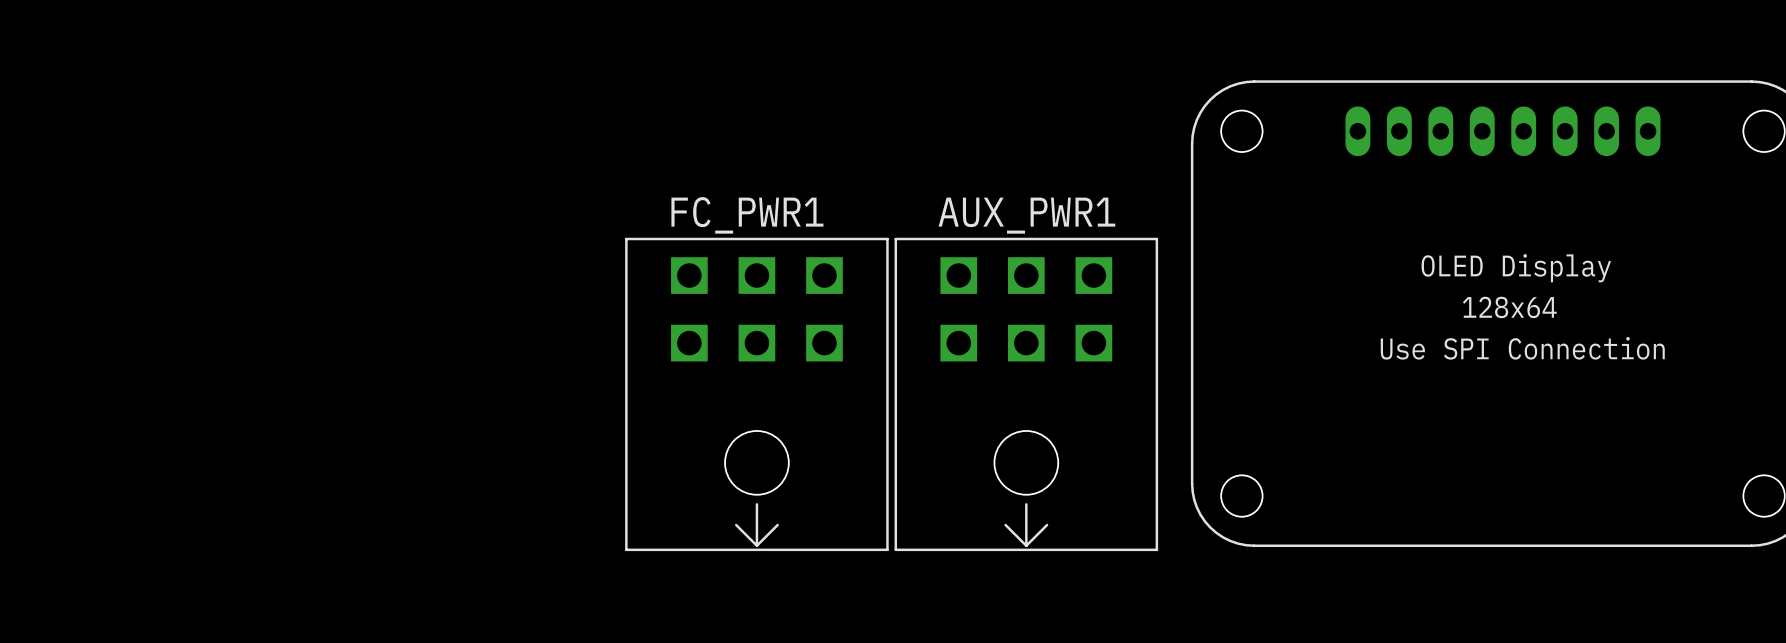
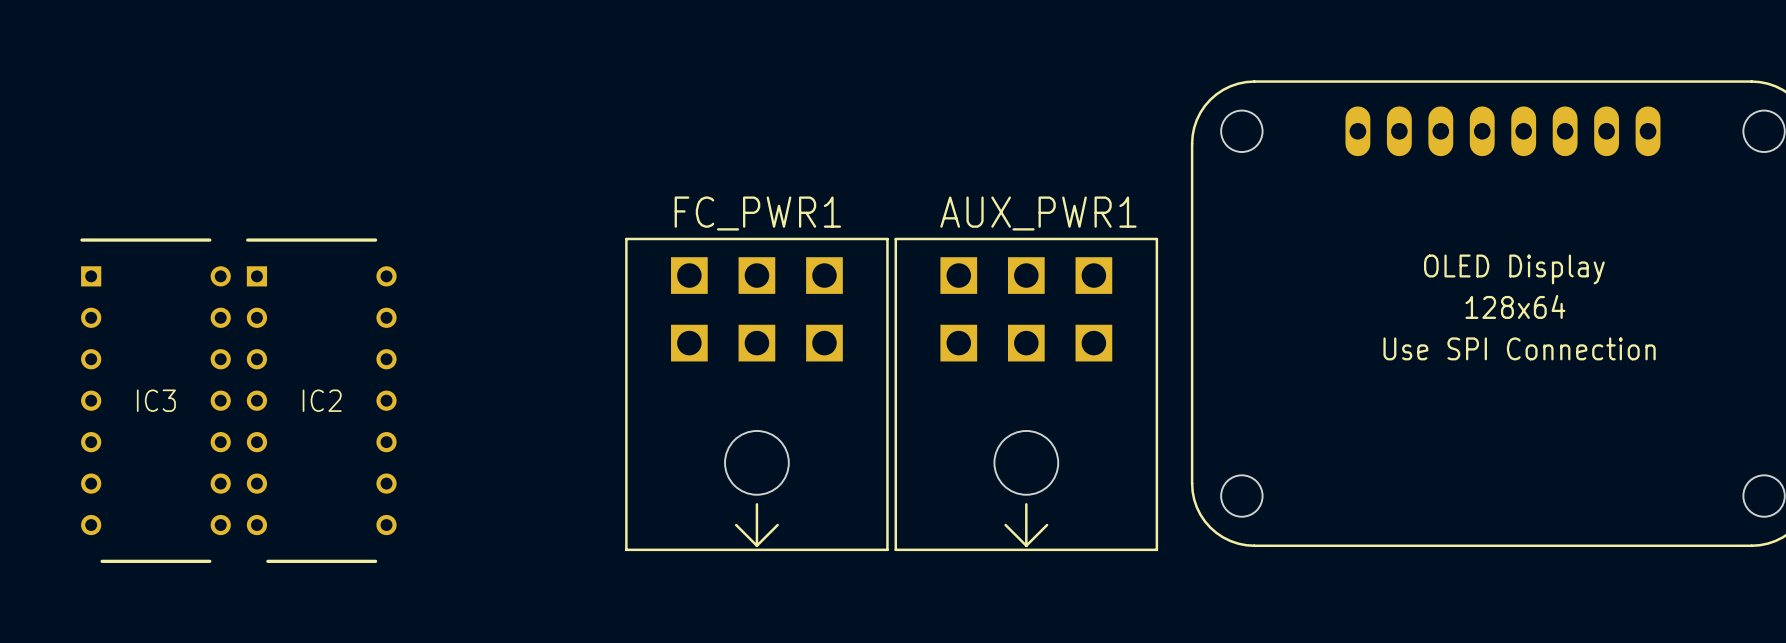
IC3: none -> (155, 400)
IC2: none -> (321, 400)

